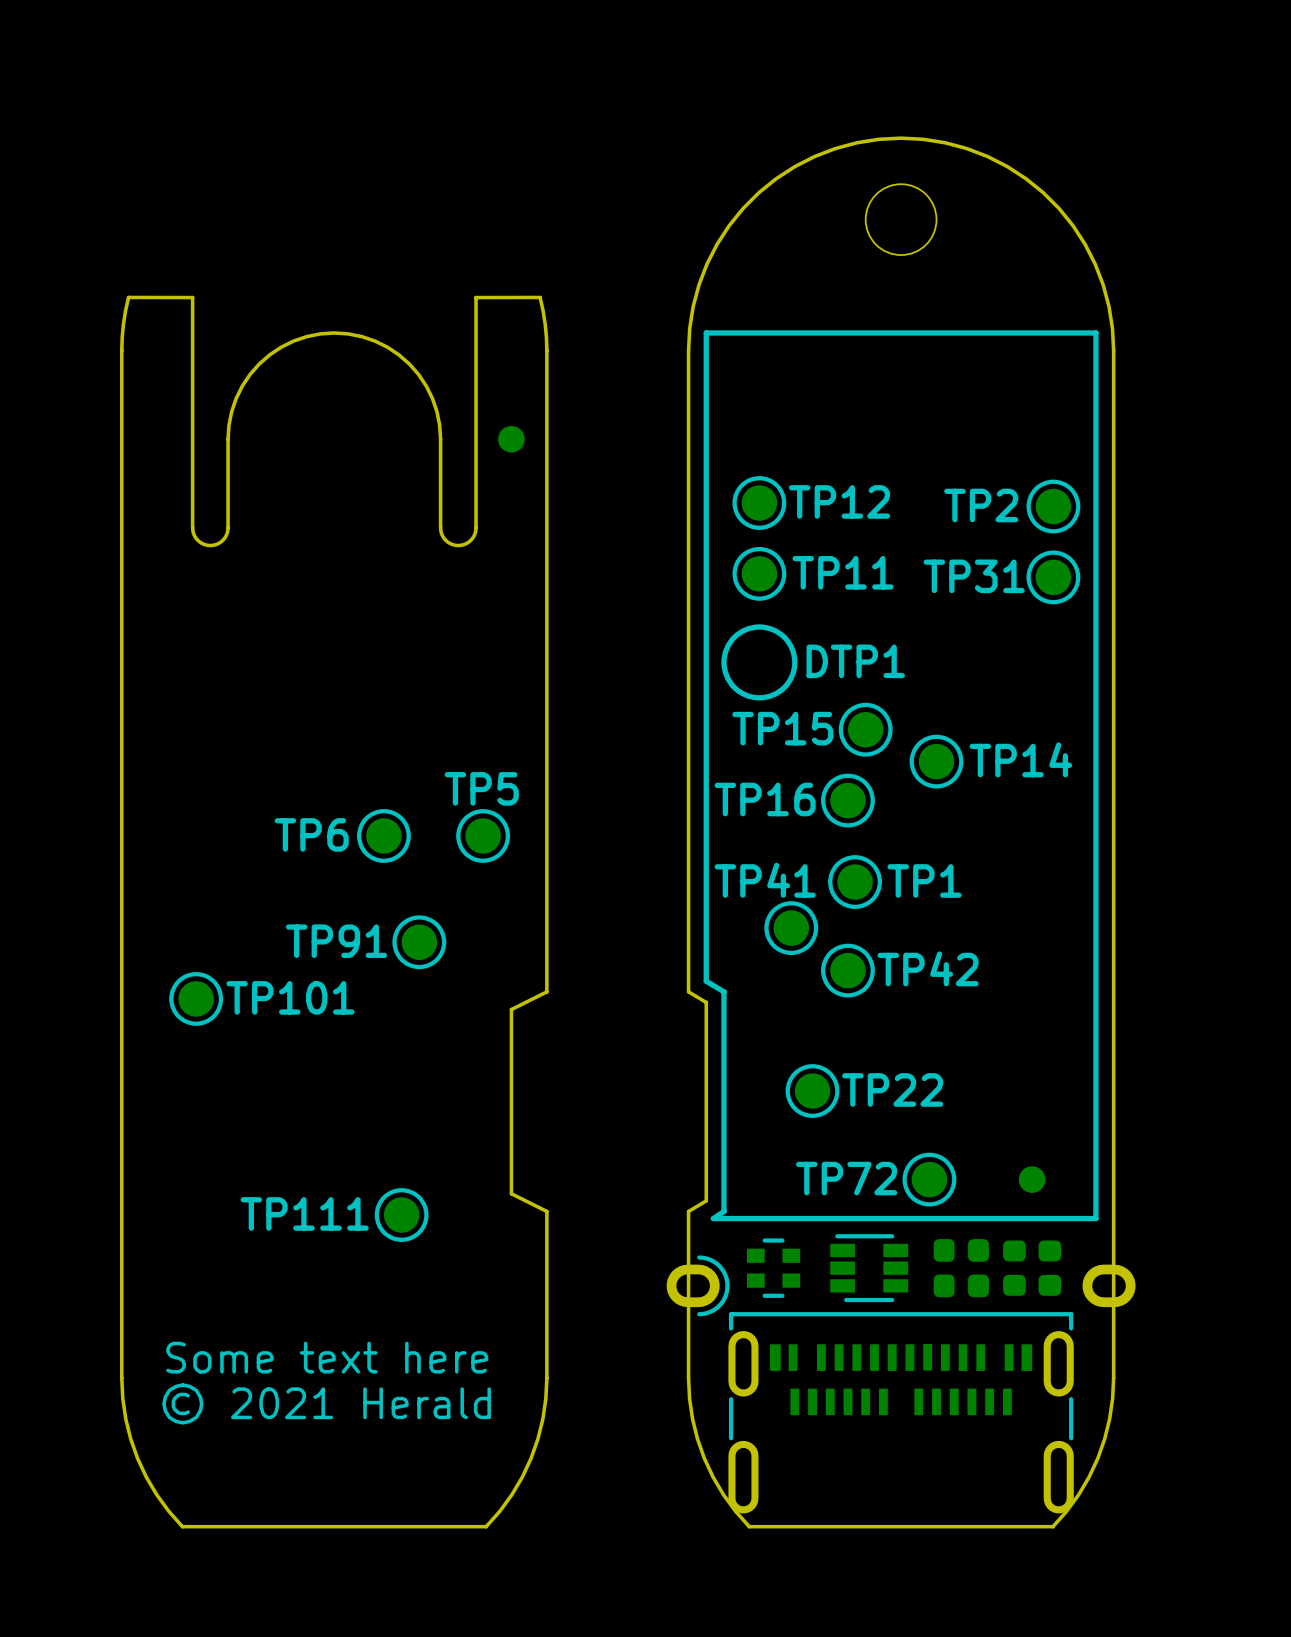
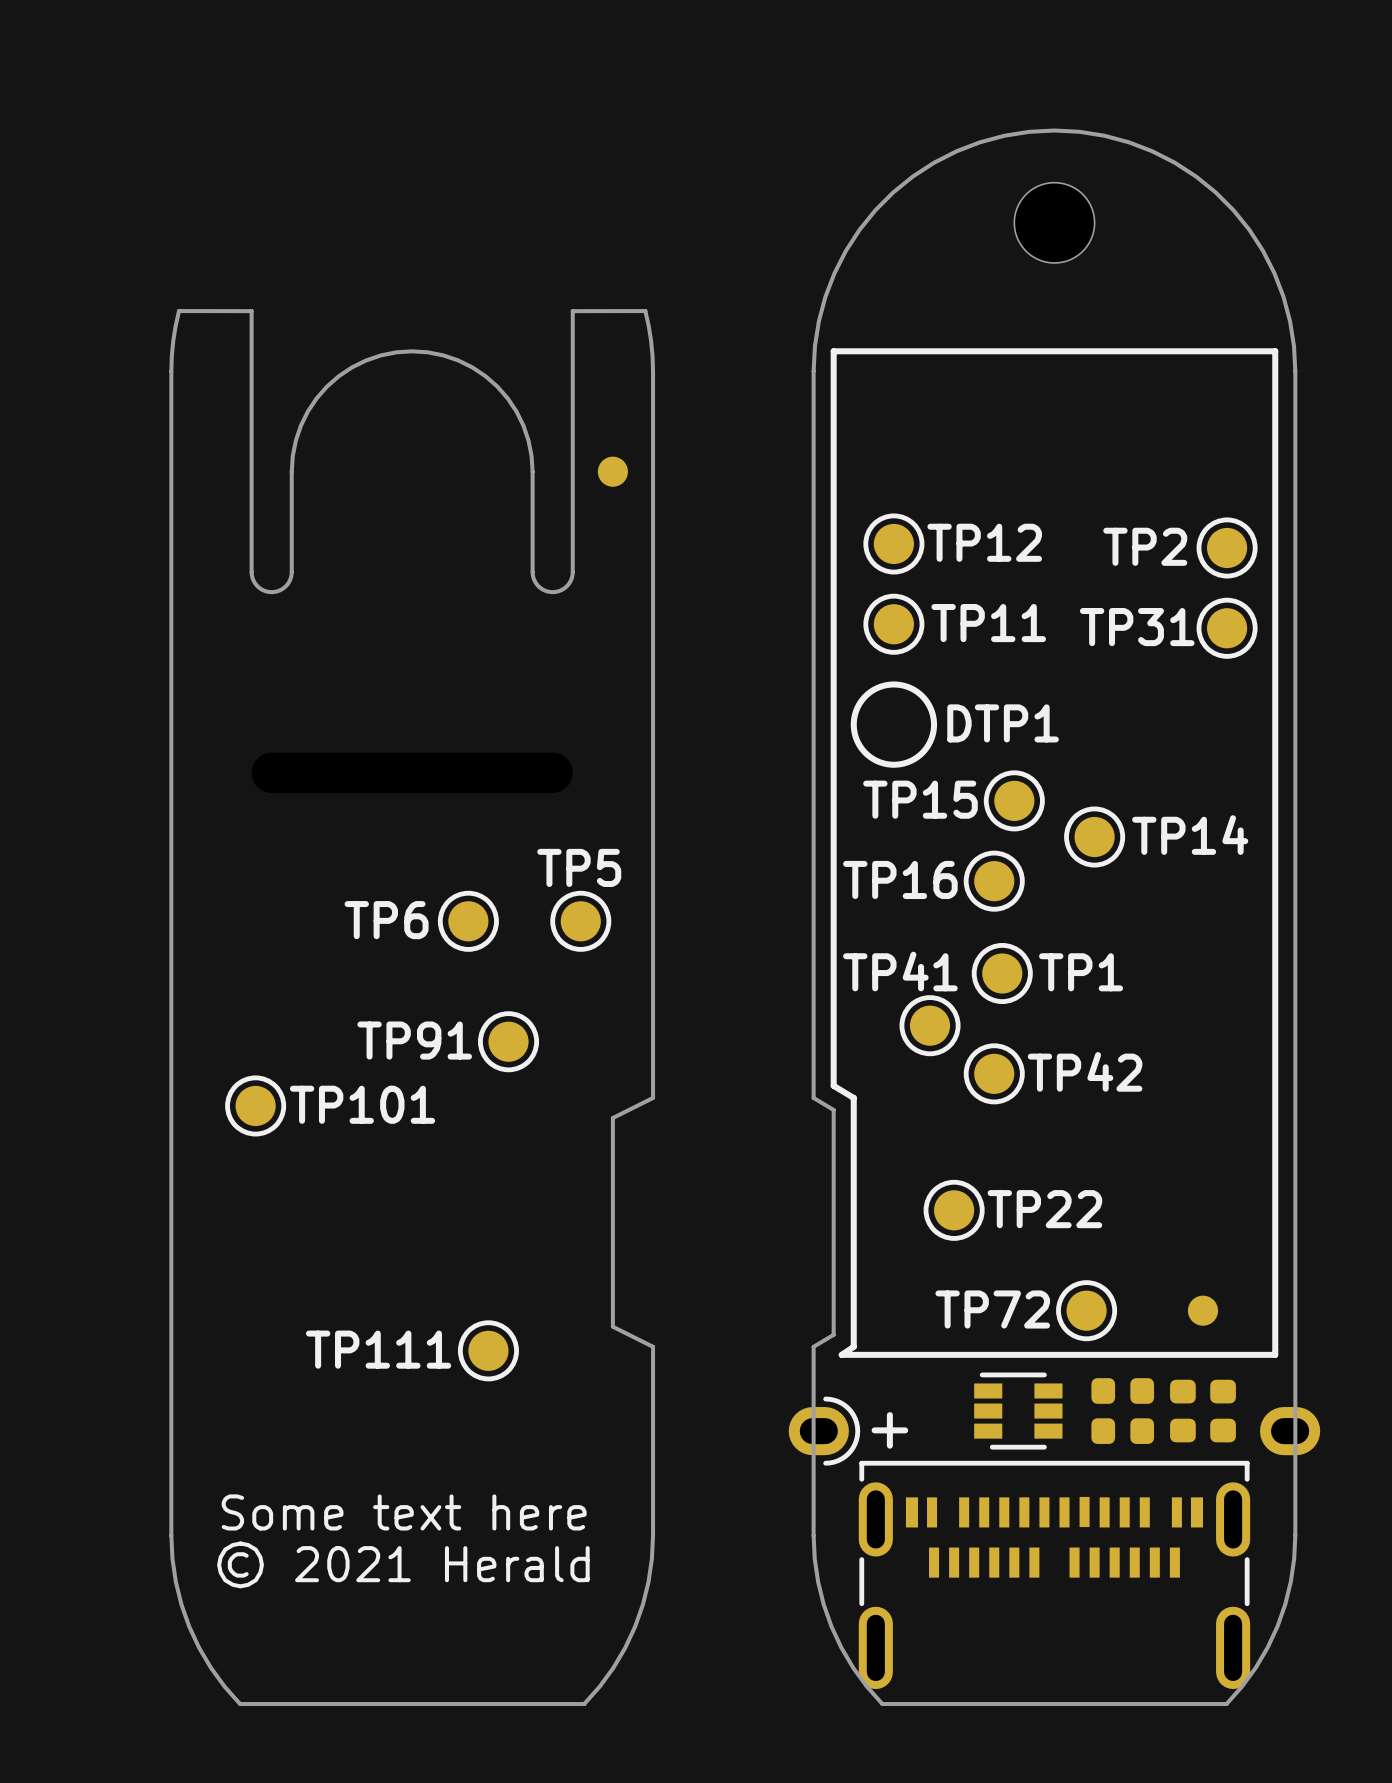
part: (773, 1268) -> none
text: none -> + (889, 1430)

